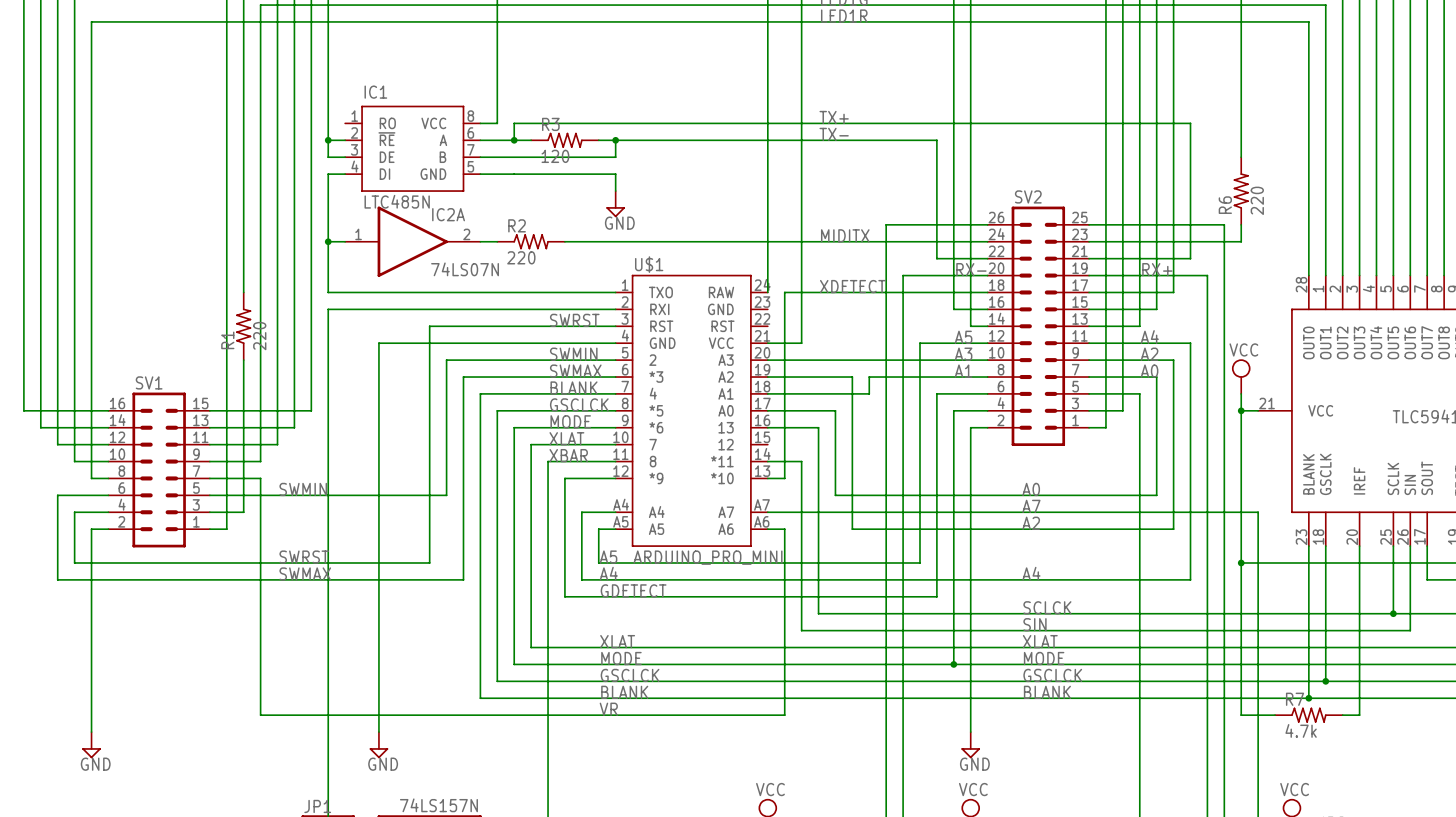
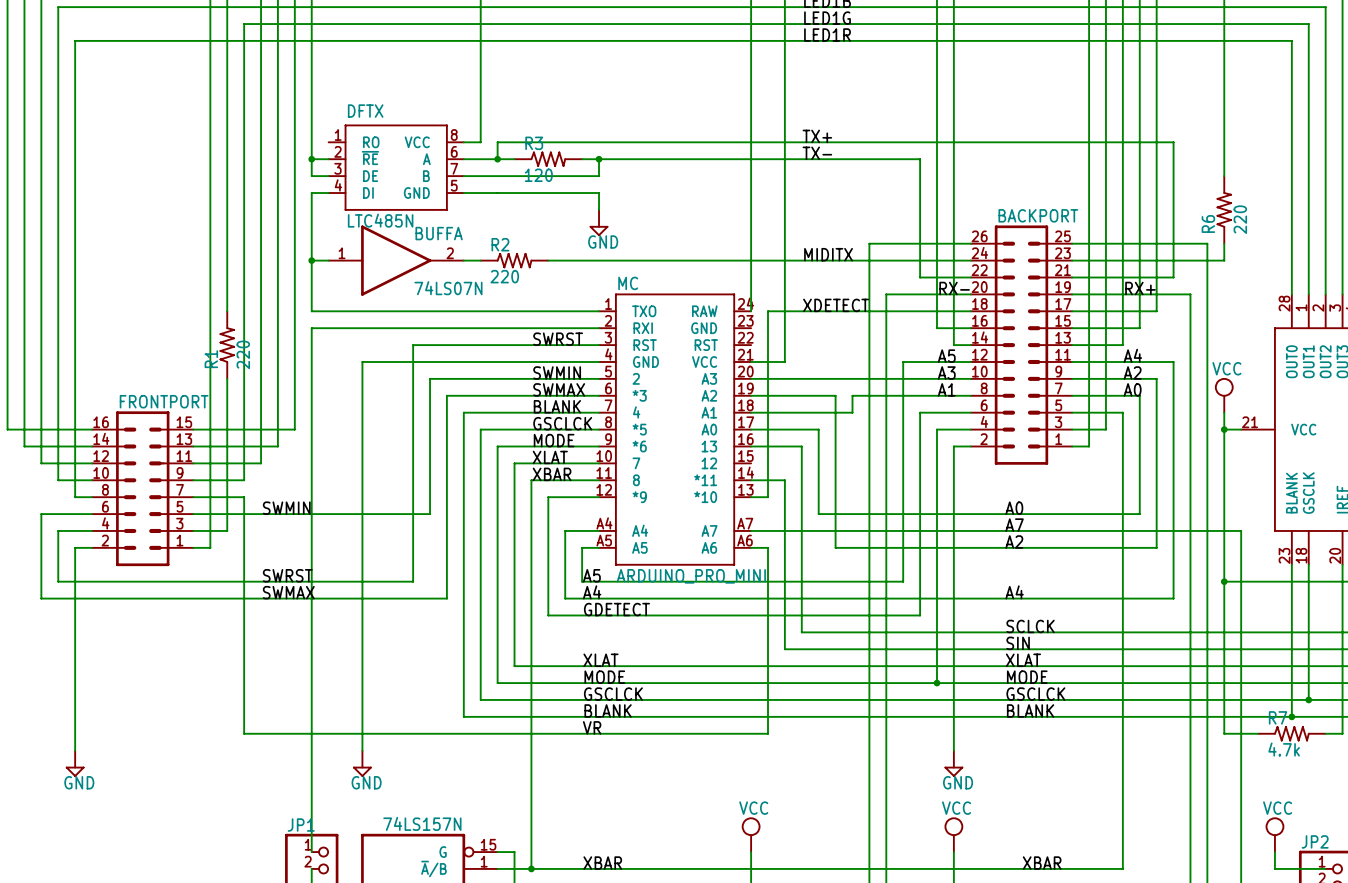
IC1 name: IC1 (375, 92) -> DFTX (365, 111)
SV2 name: SV2 (1028, 196) -> BACKPORT (1038, 215)
IC2A name: IC2A (448, 214) -> BUFFA (439, 233)
U$1 name: U$1 (649, 264) -> MC (628, 283)
SV1 name: SV1 (149, 382) -> FRONTPORT (164, 401)

